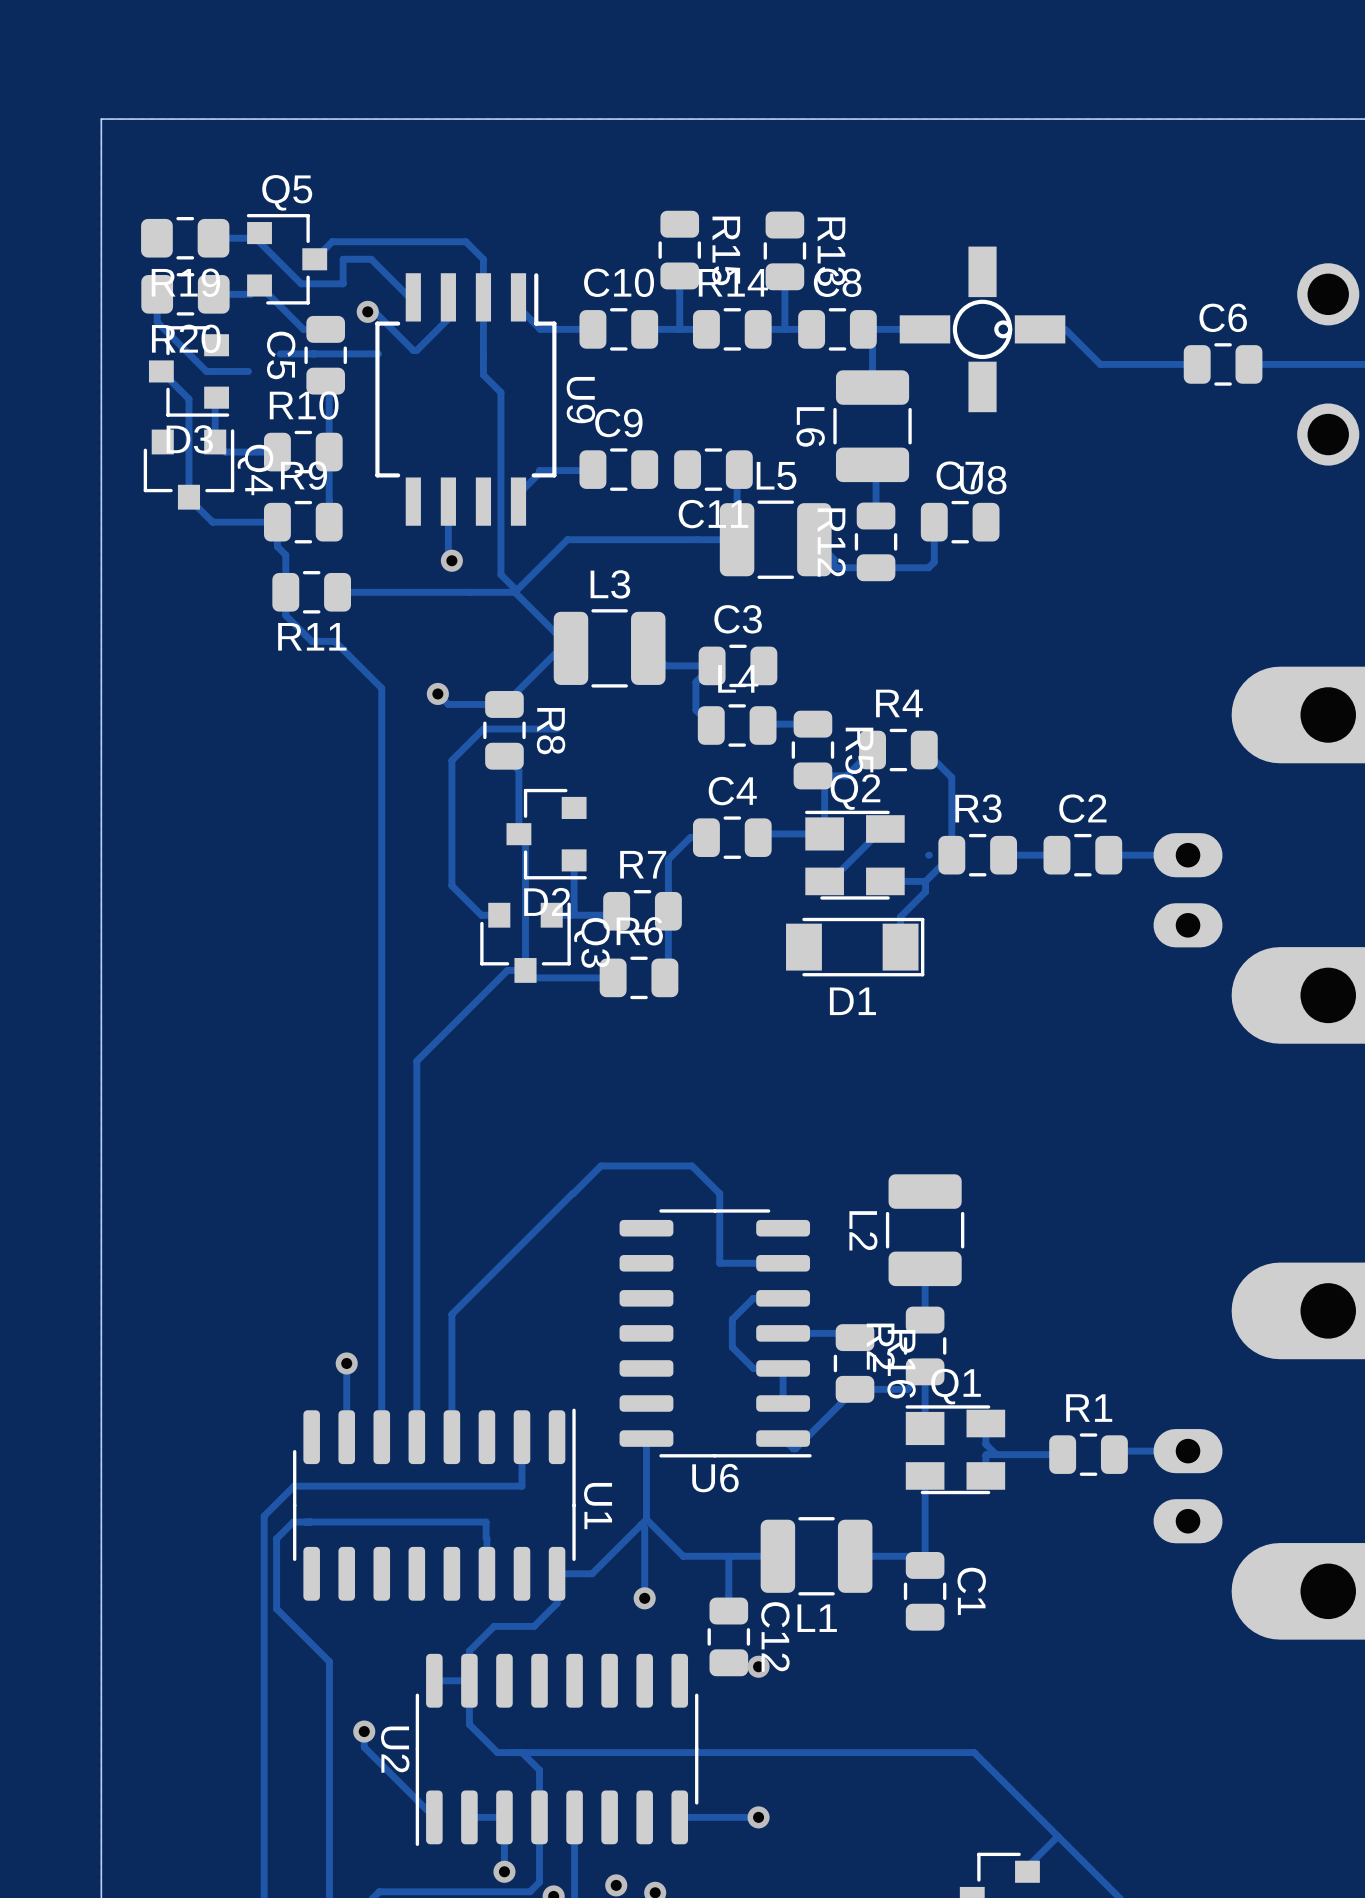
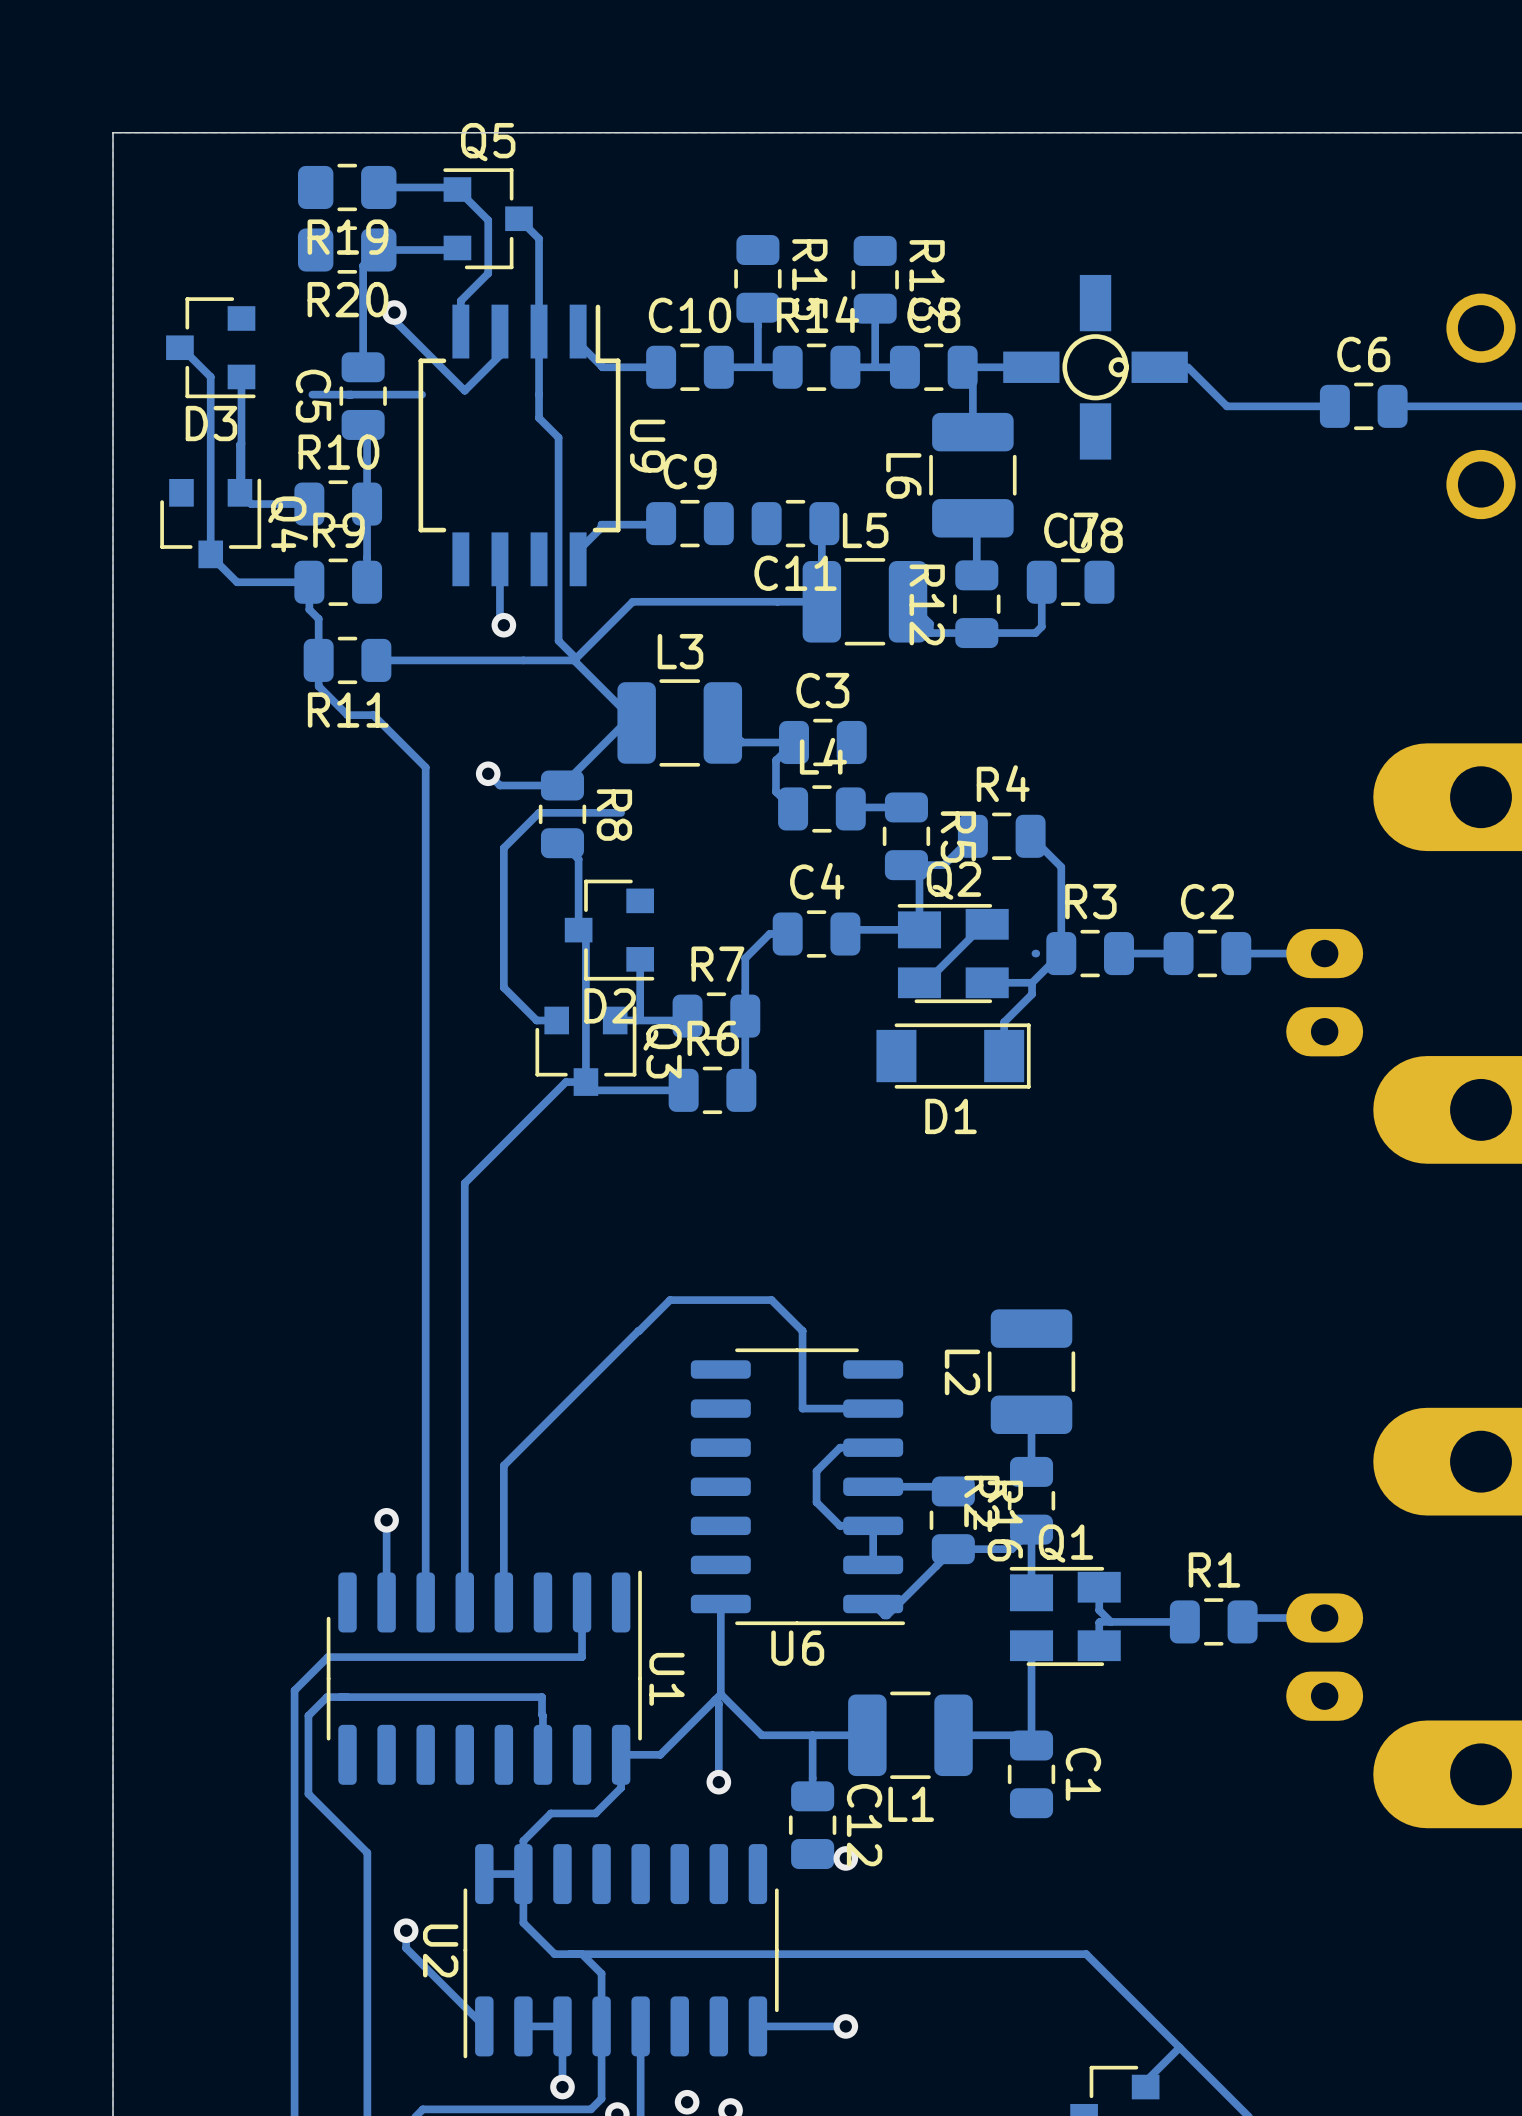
R19 position: (185, 238) -> (347, 187)
track: (213, 238) (254, 238) (259, 233) (259, 242) (301, 283) (343, 283) (343, 259) (371, 259) (409, 297) (413, 297) -> (378, 187) (455, 187) (488, 220) (488, 273) (460, 300) (460, 331)
Q5 position: (286, 259) -> (488, 218)
track: (483, 259) (465, 241) (332, 241) (314, 259) -> (539, 289) (539, 238) (519, 218)
track: (157, 294) (157, 322) (206, 371) (248, 371) -> none
R20 position: (185, 294) -> (347, 250)
track: (213, 294) (250, 294) (259, 285) (303, 329) (325, 329) -> (457, 247) (455, 250) (378, 250) (363, 265) (363, 367)
track: (367, 311) (374, 311) (413, 350) (416, 350) -> (394, 312) (394, 320) (464, 390)
via position: (367, 311) -> (394, 312)
track: none -> (241, 376) (241, 491)
track: (161, 371) (188, 399) -> (179, 347) (210, 376) (210, 444)
D3 position: (189, 371) -> (210, 347)

